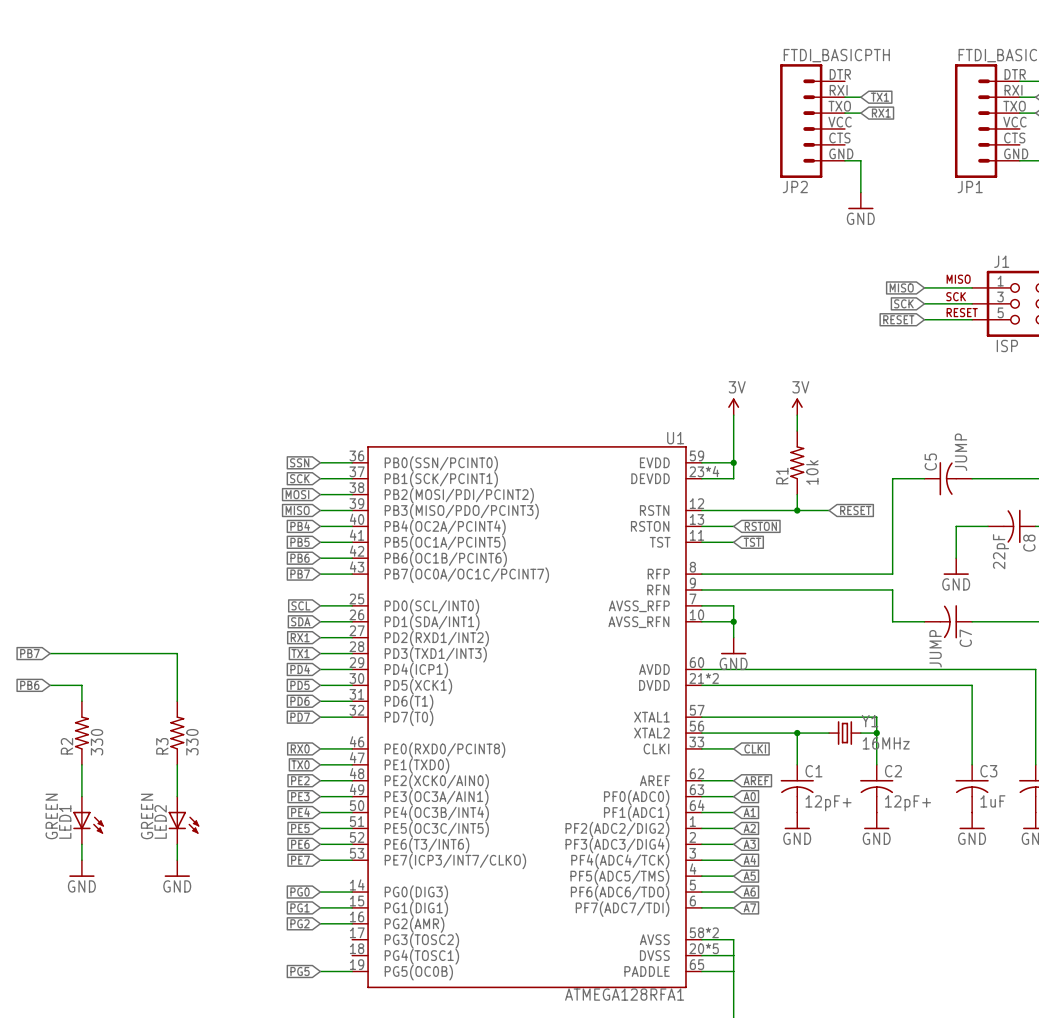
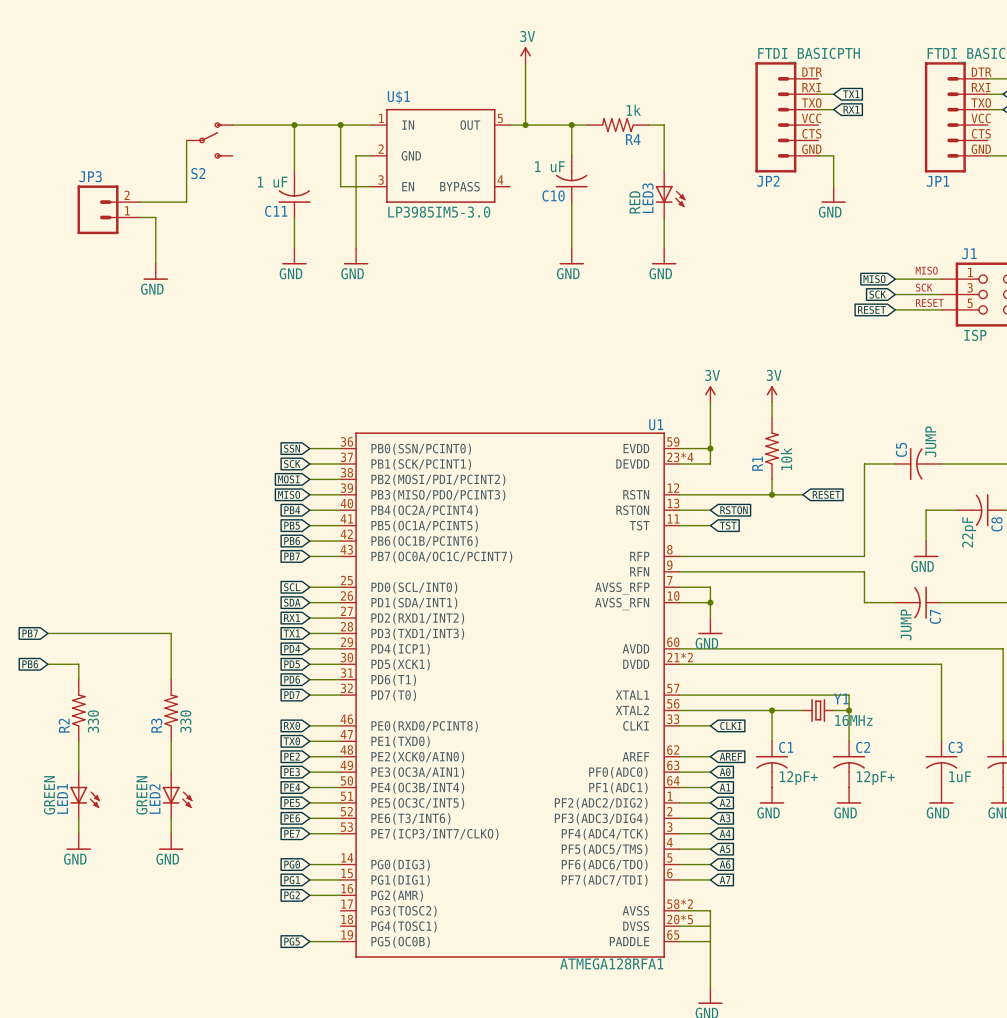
power symbol: none -> 3V (525, 55)
wire: none -> (525, 63) (525, 125)
wire: none -> (232, 125) (371, 125)
wire: none -> (294, 125) (294, 171)
junction: none -> (294, 125)
wire: none -> (340, 125) (340, 186) (371, 186)
junction: none -> (340, 125)
wire: none -> (510, 125) (587, 125)
junction: none -> (525, 125)
wire: none -> (571, 125) (571, 155)
junction: none -> (571, 125)
R4: none -> 1k (617, 125)
wire: none -> (648, 125) (664, 125) (664, 171)
wire: none -> (186, 140) (186, 202) (140, 202)
S2: none -> (209, 140)
wire: none -> (371, 155) (356, 155) (356, 248)
U$1: none -> LP3985IM5-3.0 (440, 155)
C10: none -> 1 uF (571, 178)
C11: none -> 1 uF (294, 194)
LED3: none -> RED (670, 194)
wire: none -> (571, 202) (571, 248)
JP3: none -> (108, 209)
wire: none -> (140, 217) (155, 217) (155, 263)
wire: none -> (294, 217) (294, 248)
wire: none -> (664, 217) (664, 248)
power symbol: none -> GND (294, 256)
power symbol: none -> GND (356, 256)
power symbol: none -> GND (571, 256)
power symbol: none -> GND (664, 256)
power symbol: none -> GND (155, 271)

